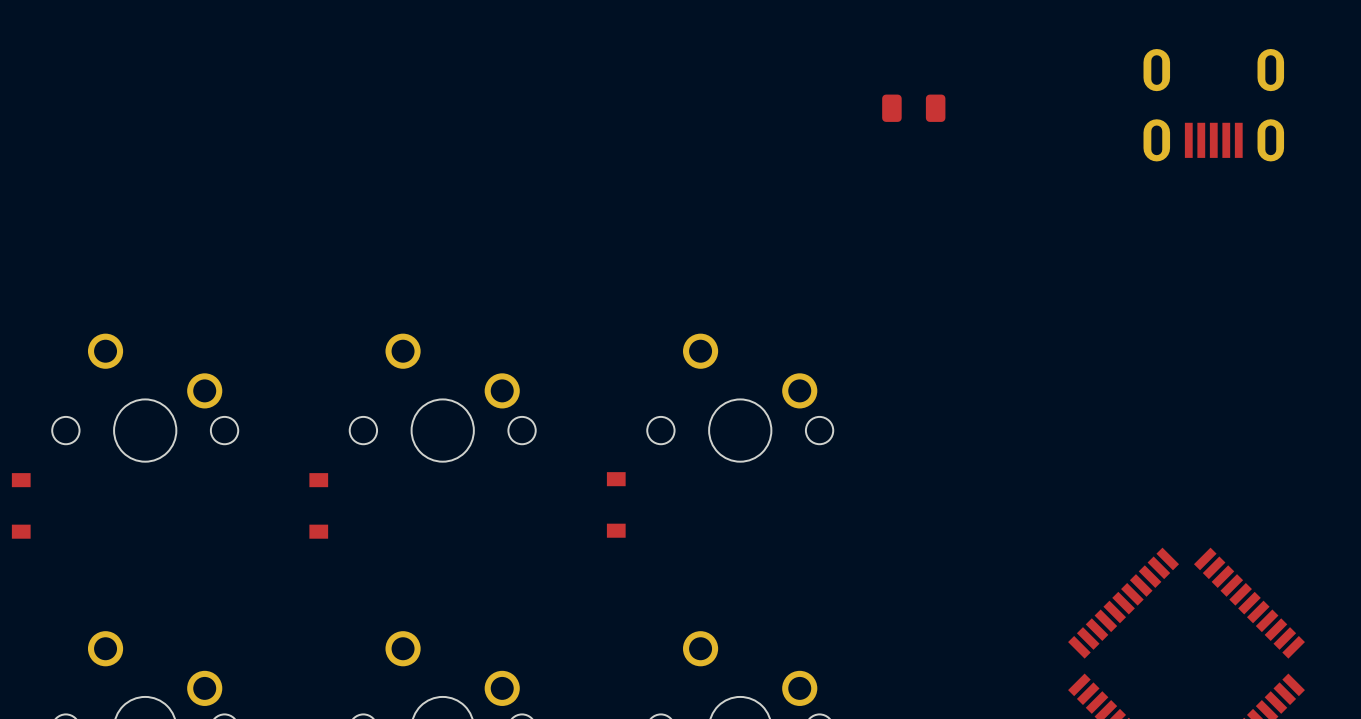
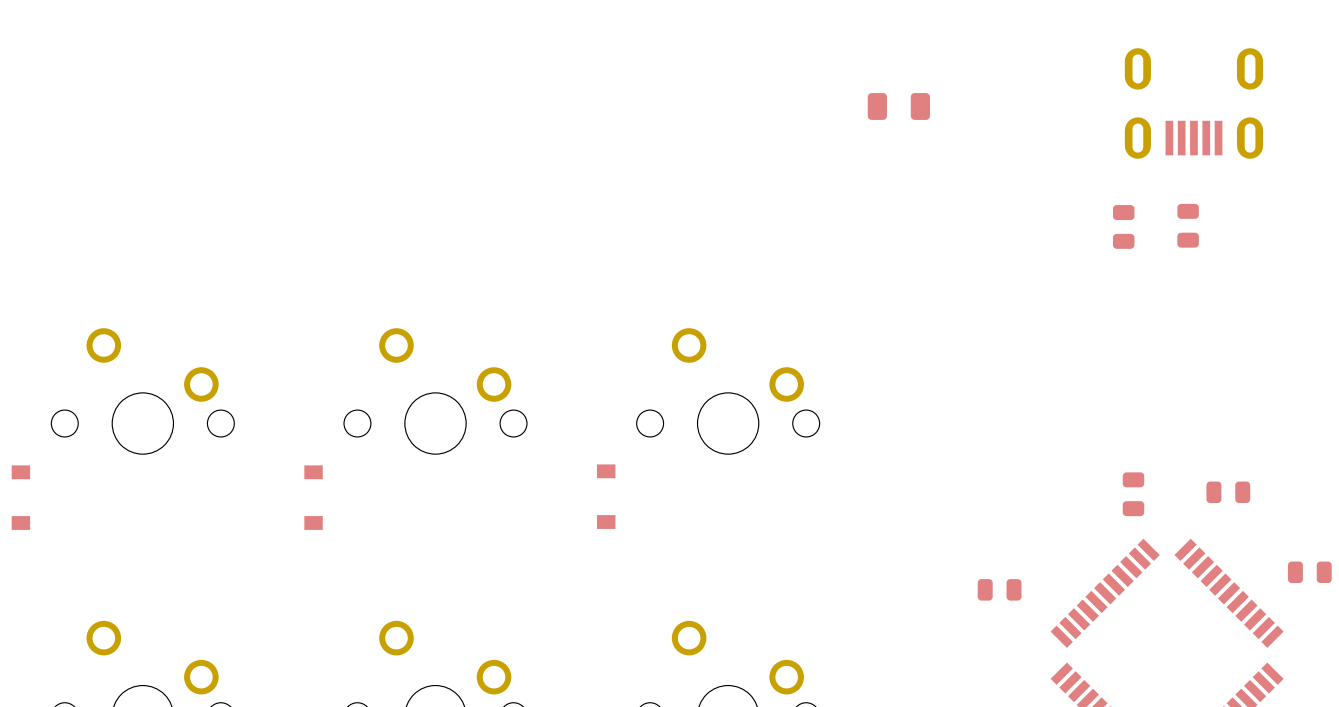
part: none -> (1188, 225)
part: none -> (1123, 226)
part: none -> (1228, 492)
part: none -> (1133, 494)
part: none -> (1309, 572)
part: none -> (999, 589)

